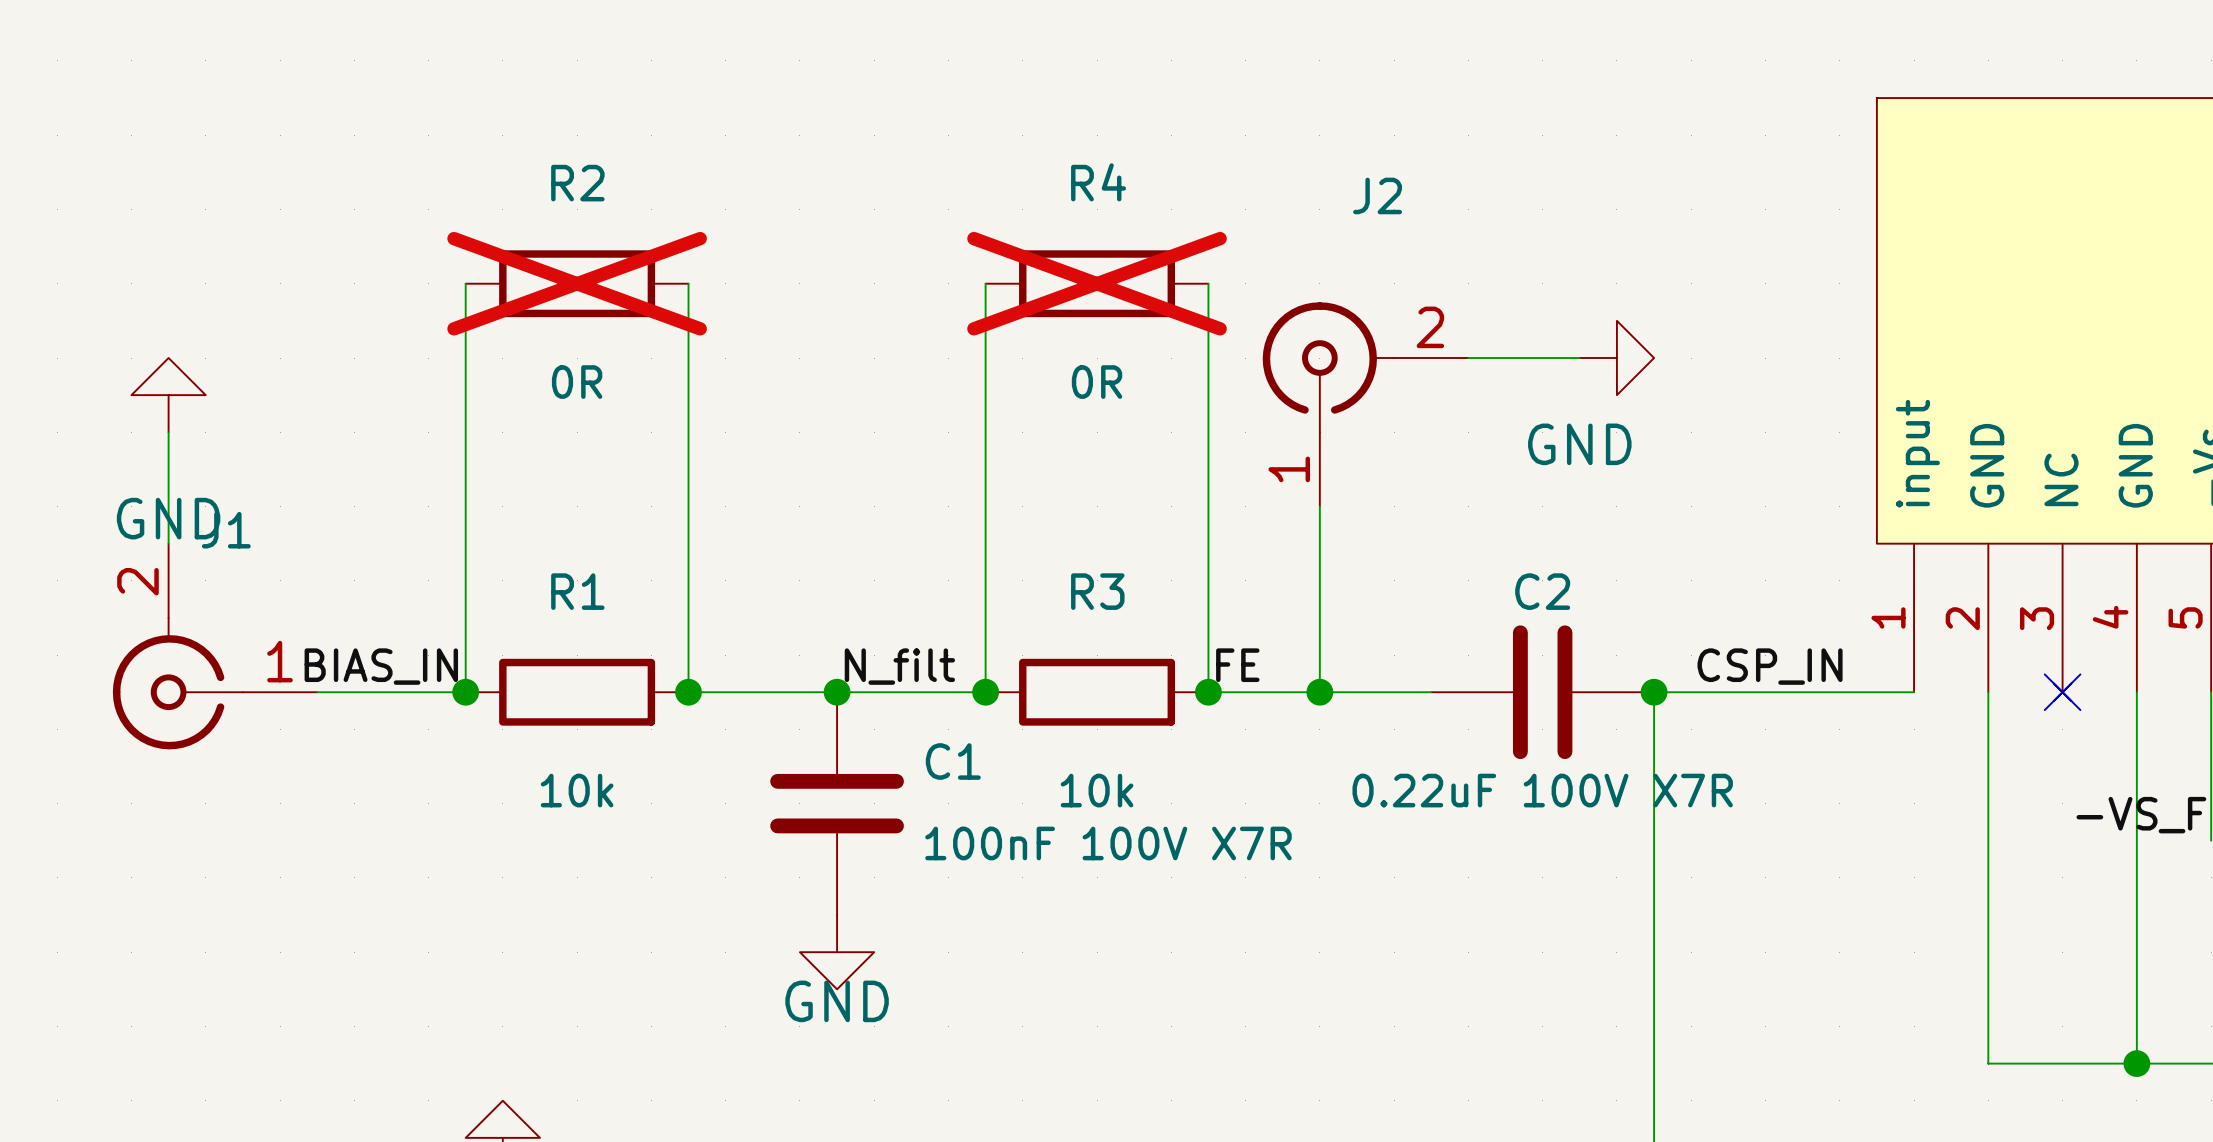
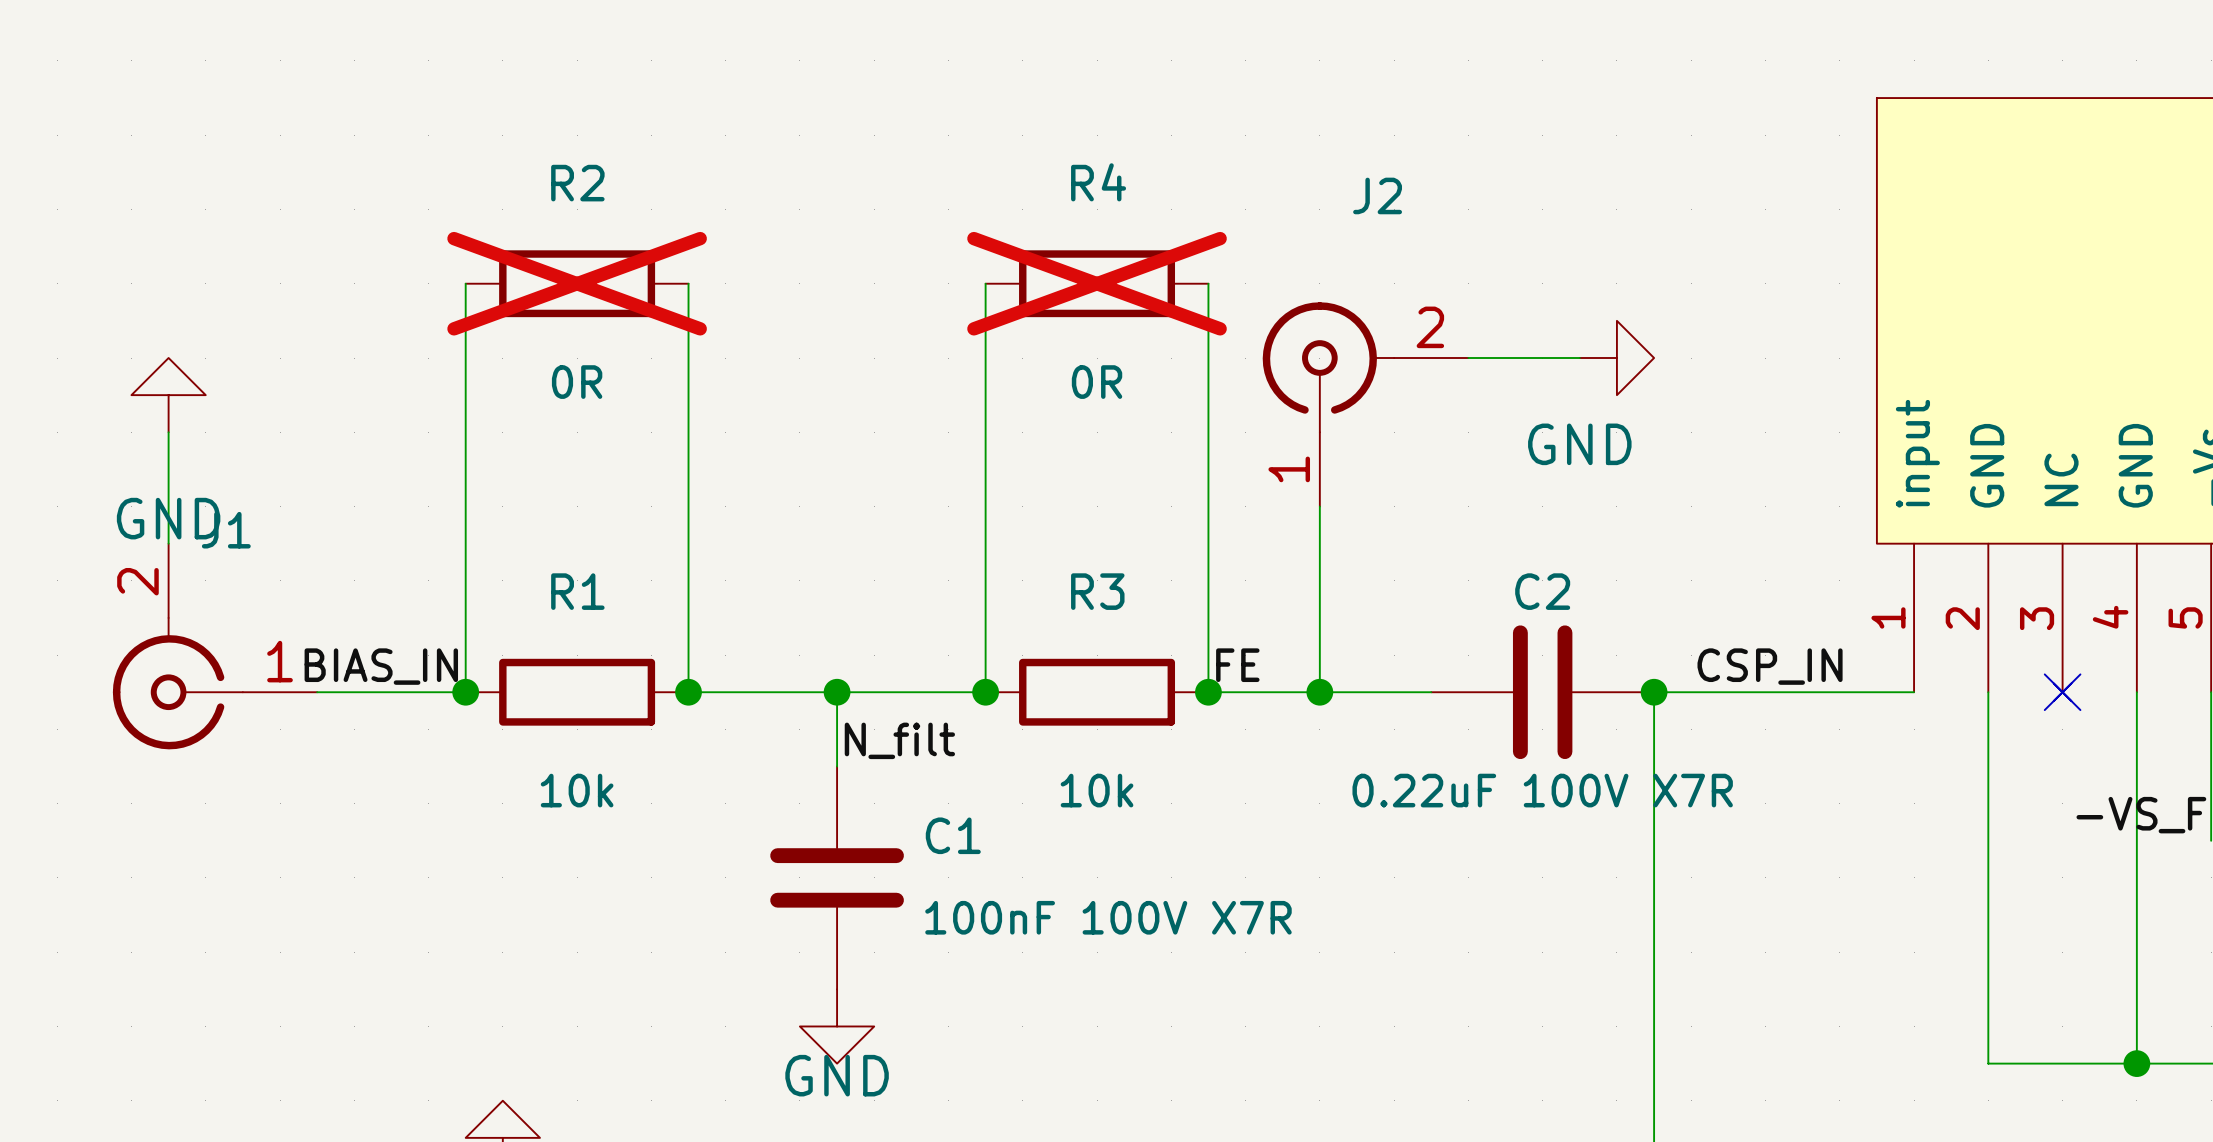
label position: N_filt (899, 666) -> N_filt (899, 740)
C1 position: (837, 803) -> (837, 877)
power symbol position: GND (837, 952) -> GND (837, 1026)

